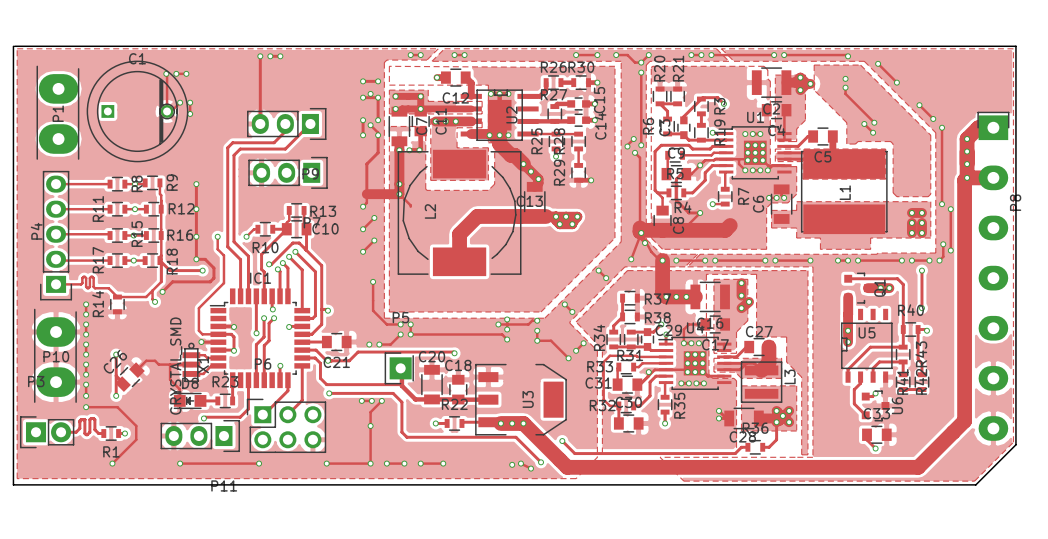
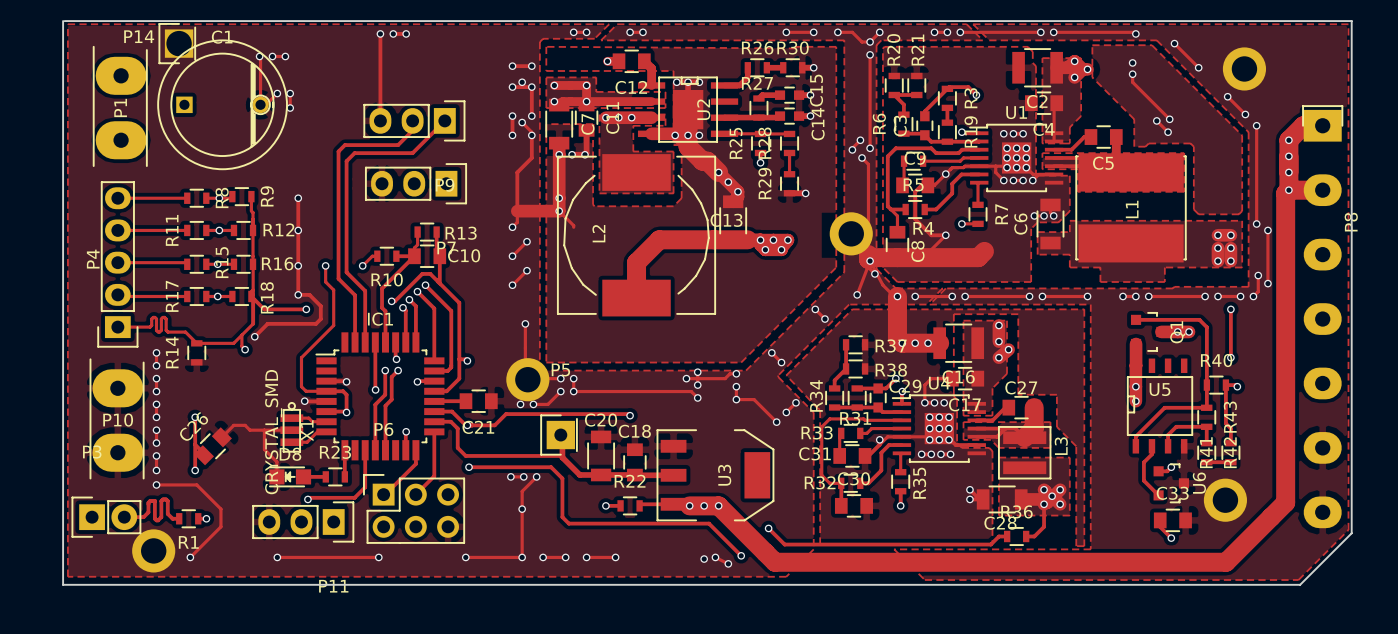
P14: none -> (699, 297)

